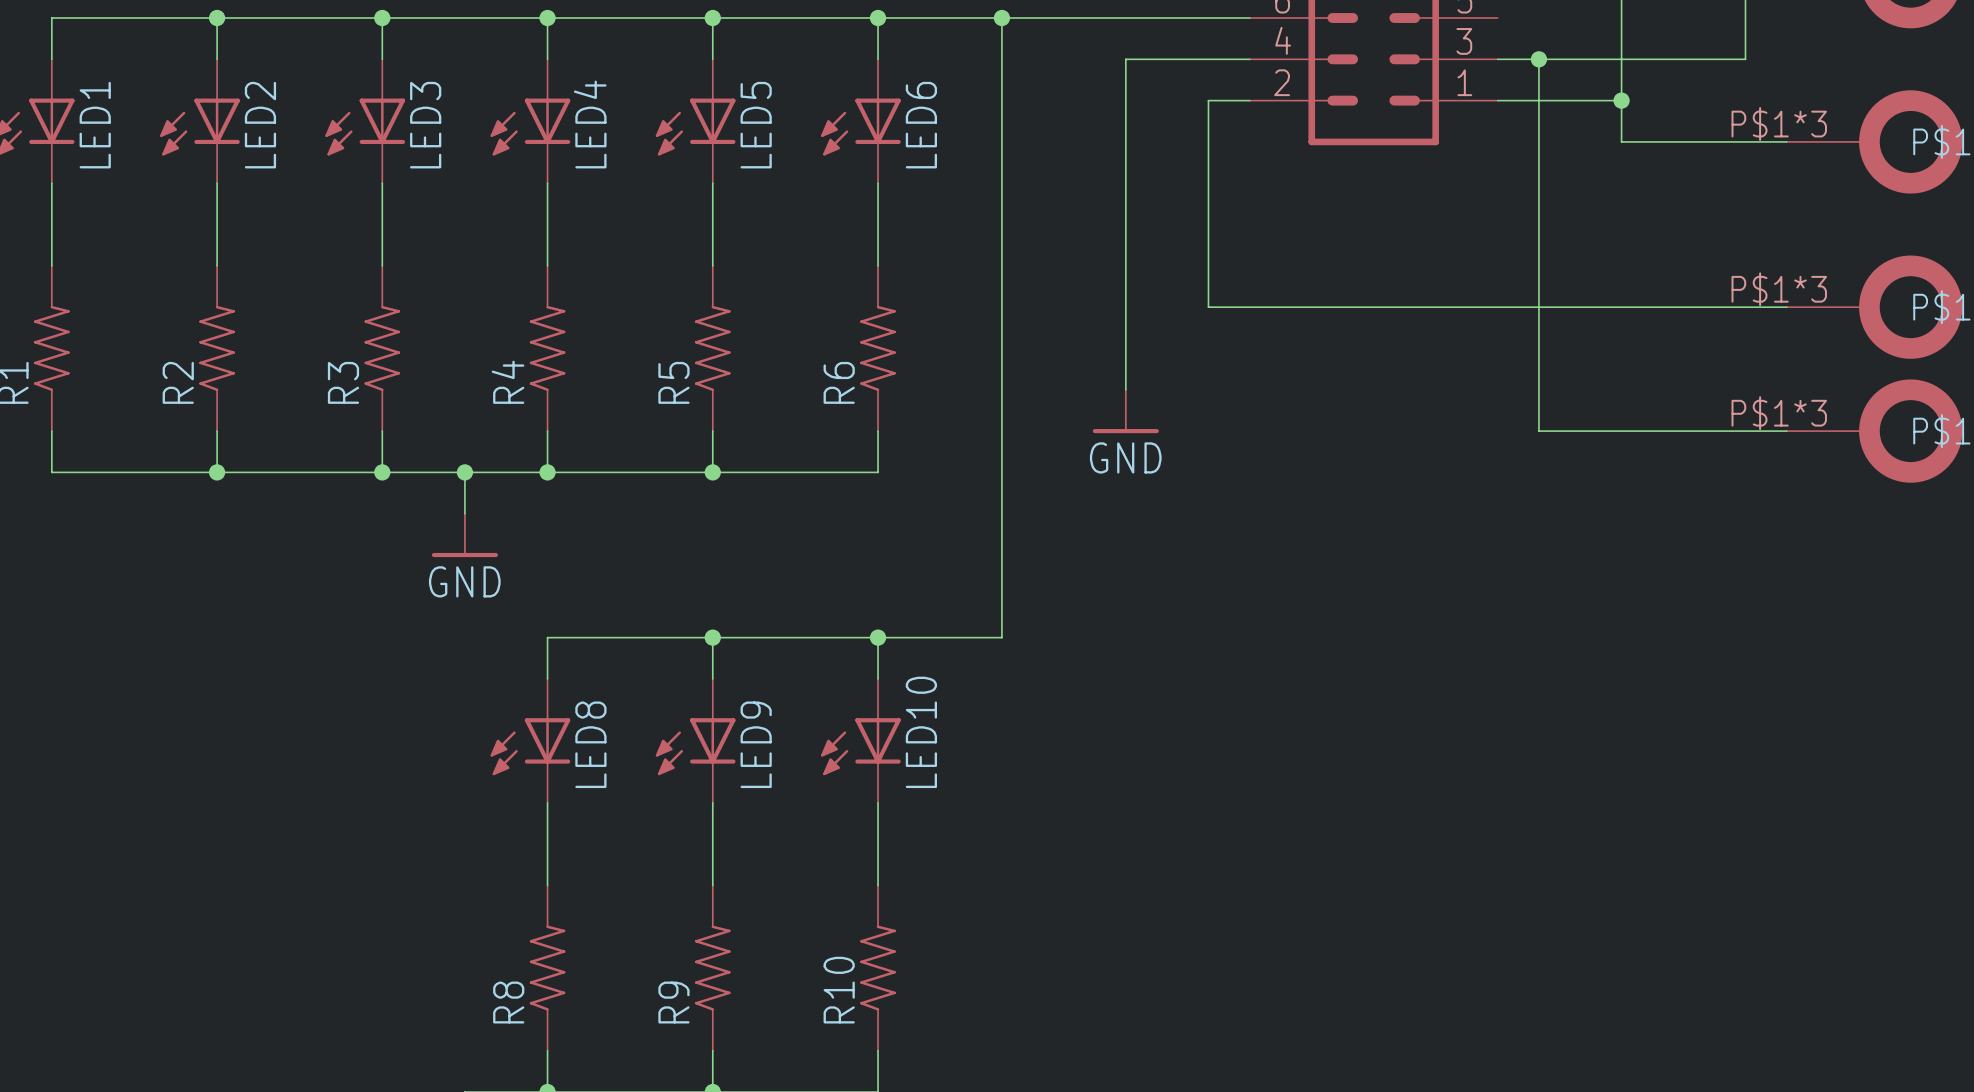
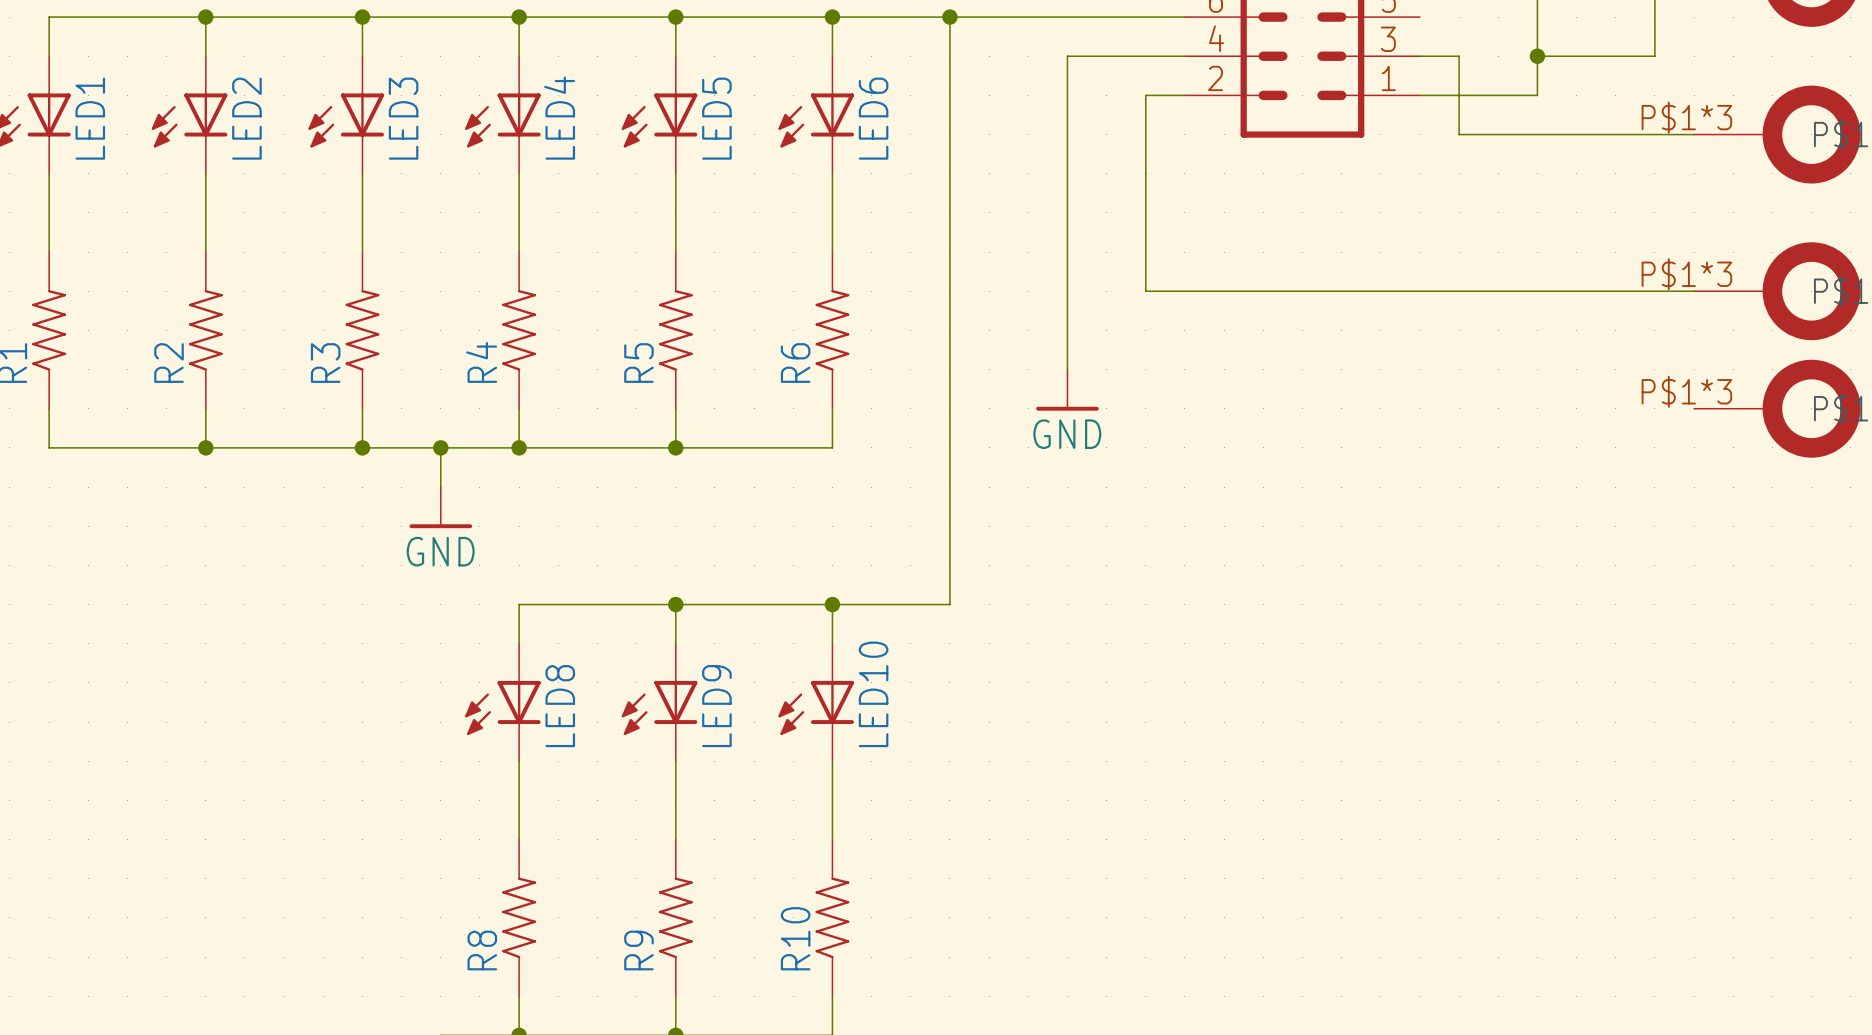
wire: (1538, 59) (1621, 59) -> none
junction: (1538, 59) -> none
junction: none -> (1537, 56)
wire: (1621, 100) (1621, 141) -> (1459, 134) (1537, 134)
junction: (1621, 100) -> none
wire: (1538, 141) (1538, 431) (1786, 431) -> none

